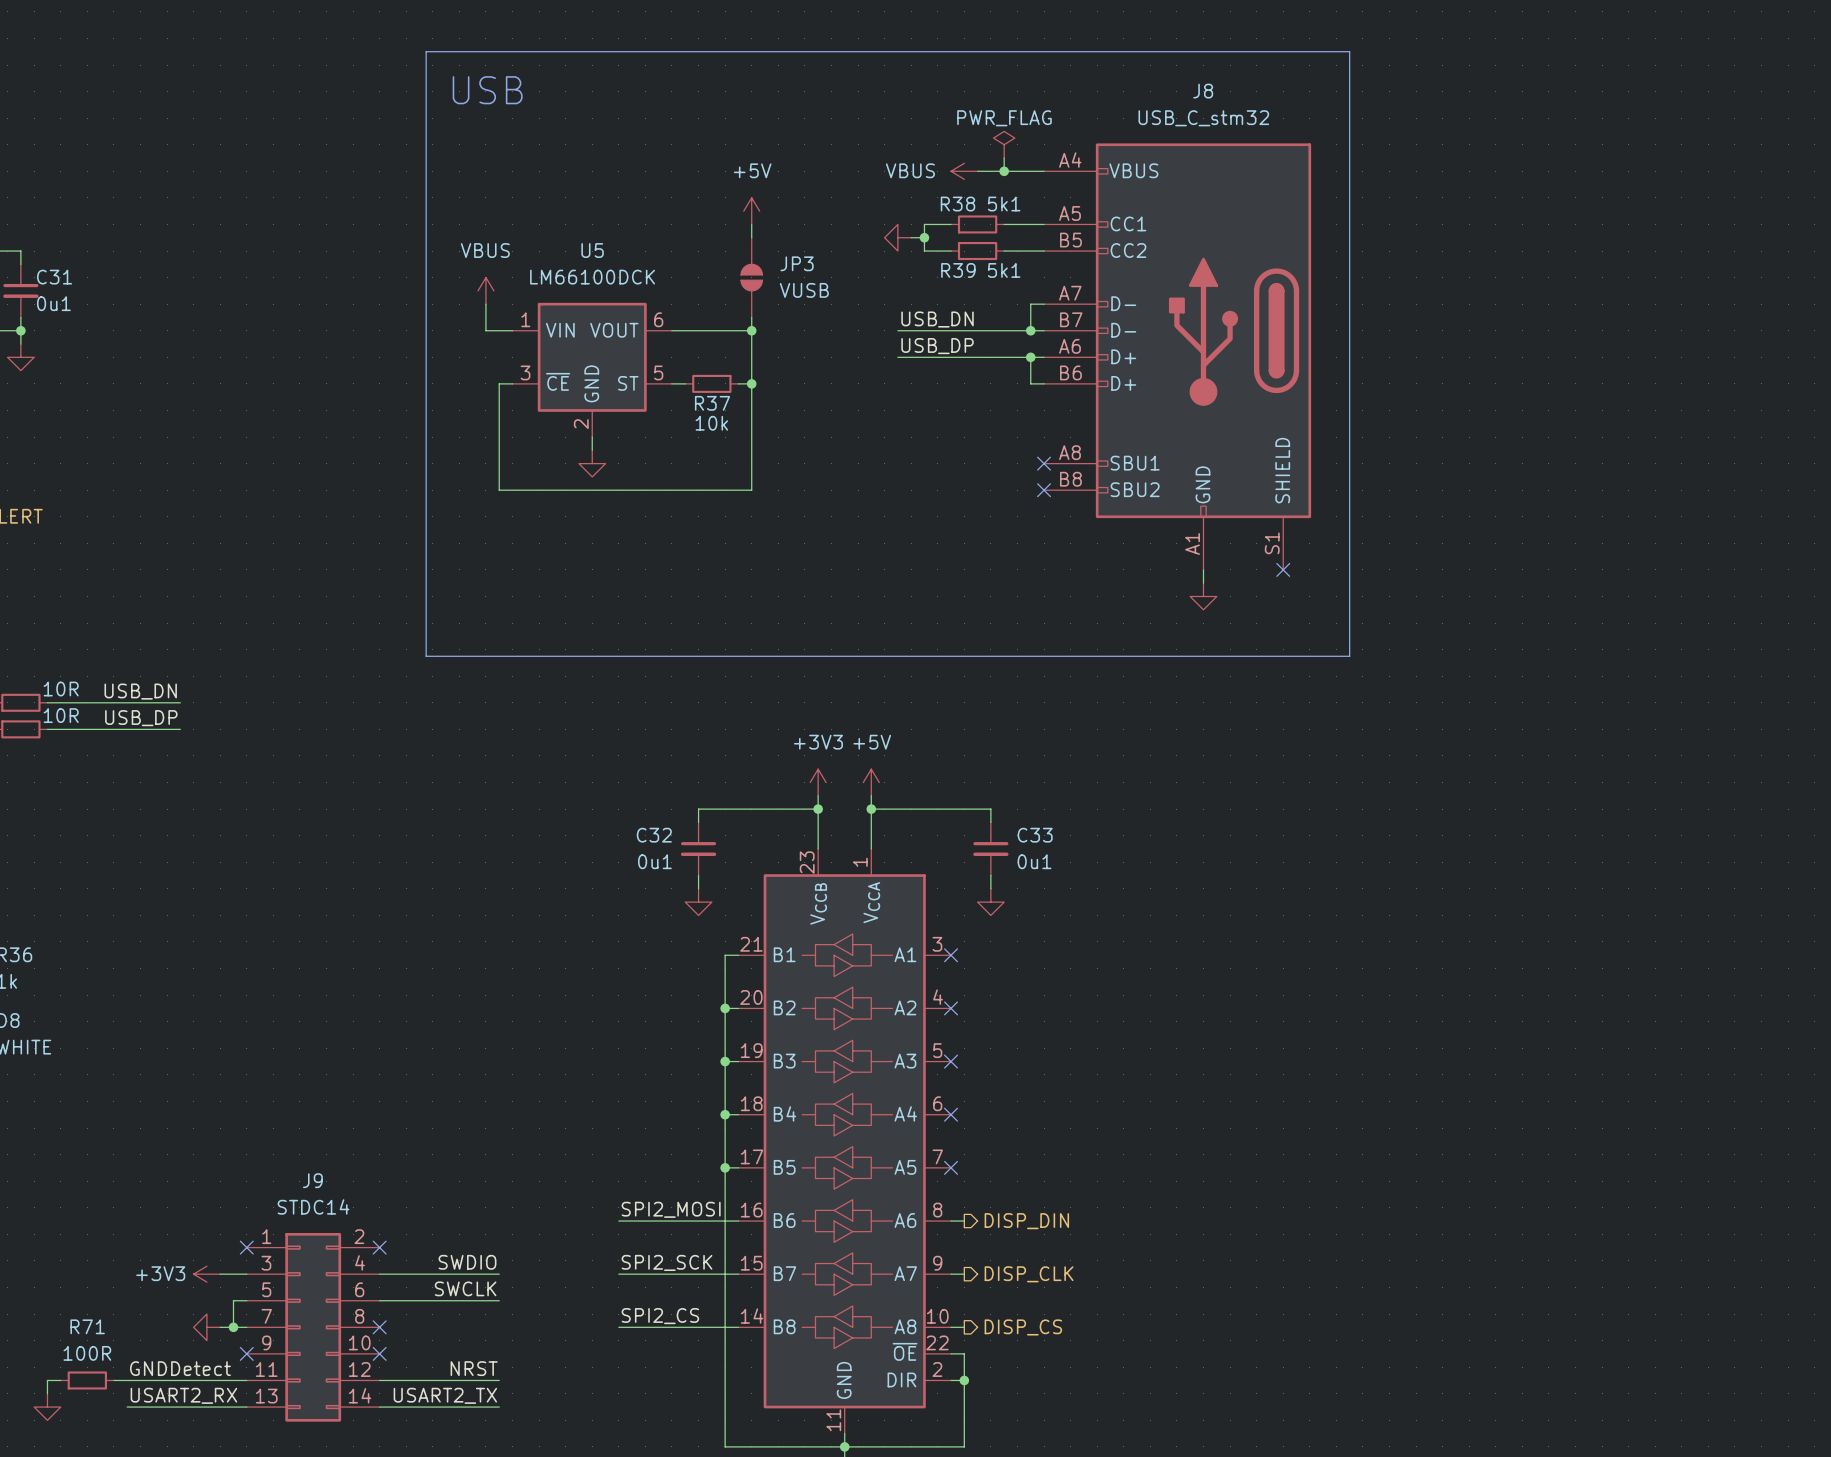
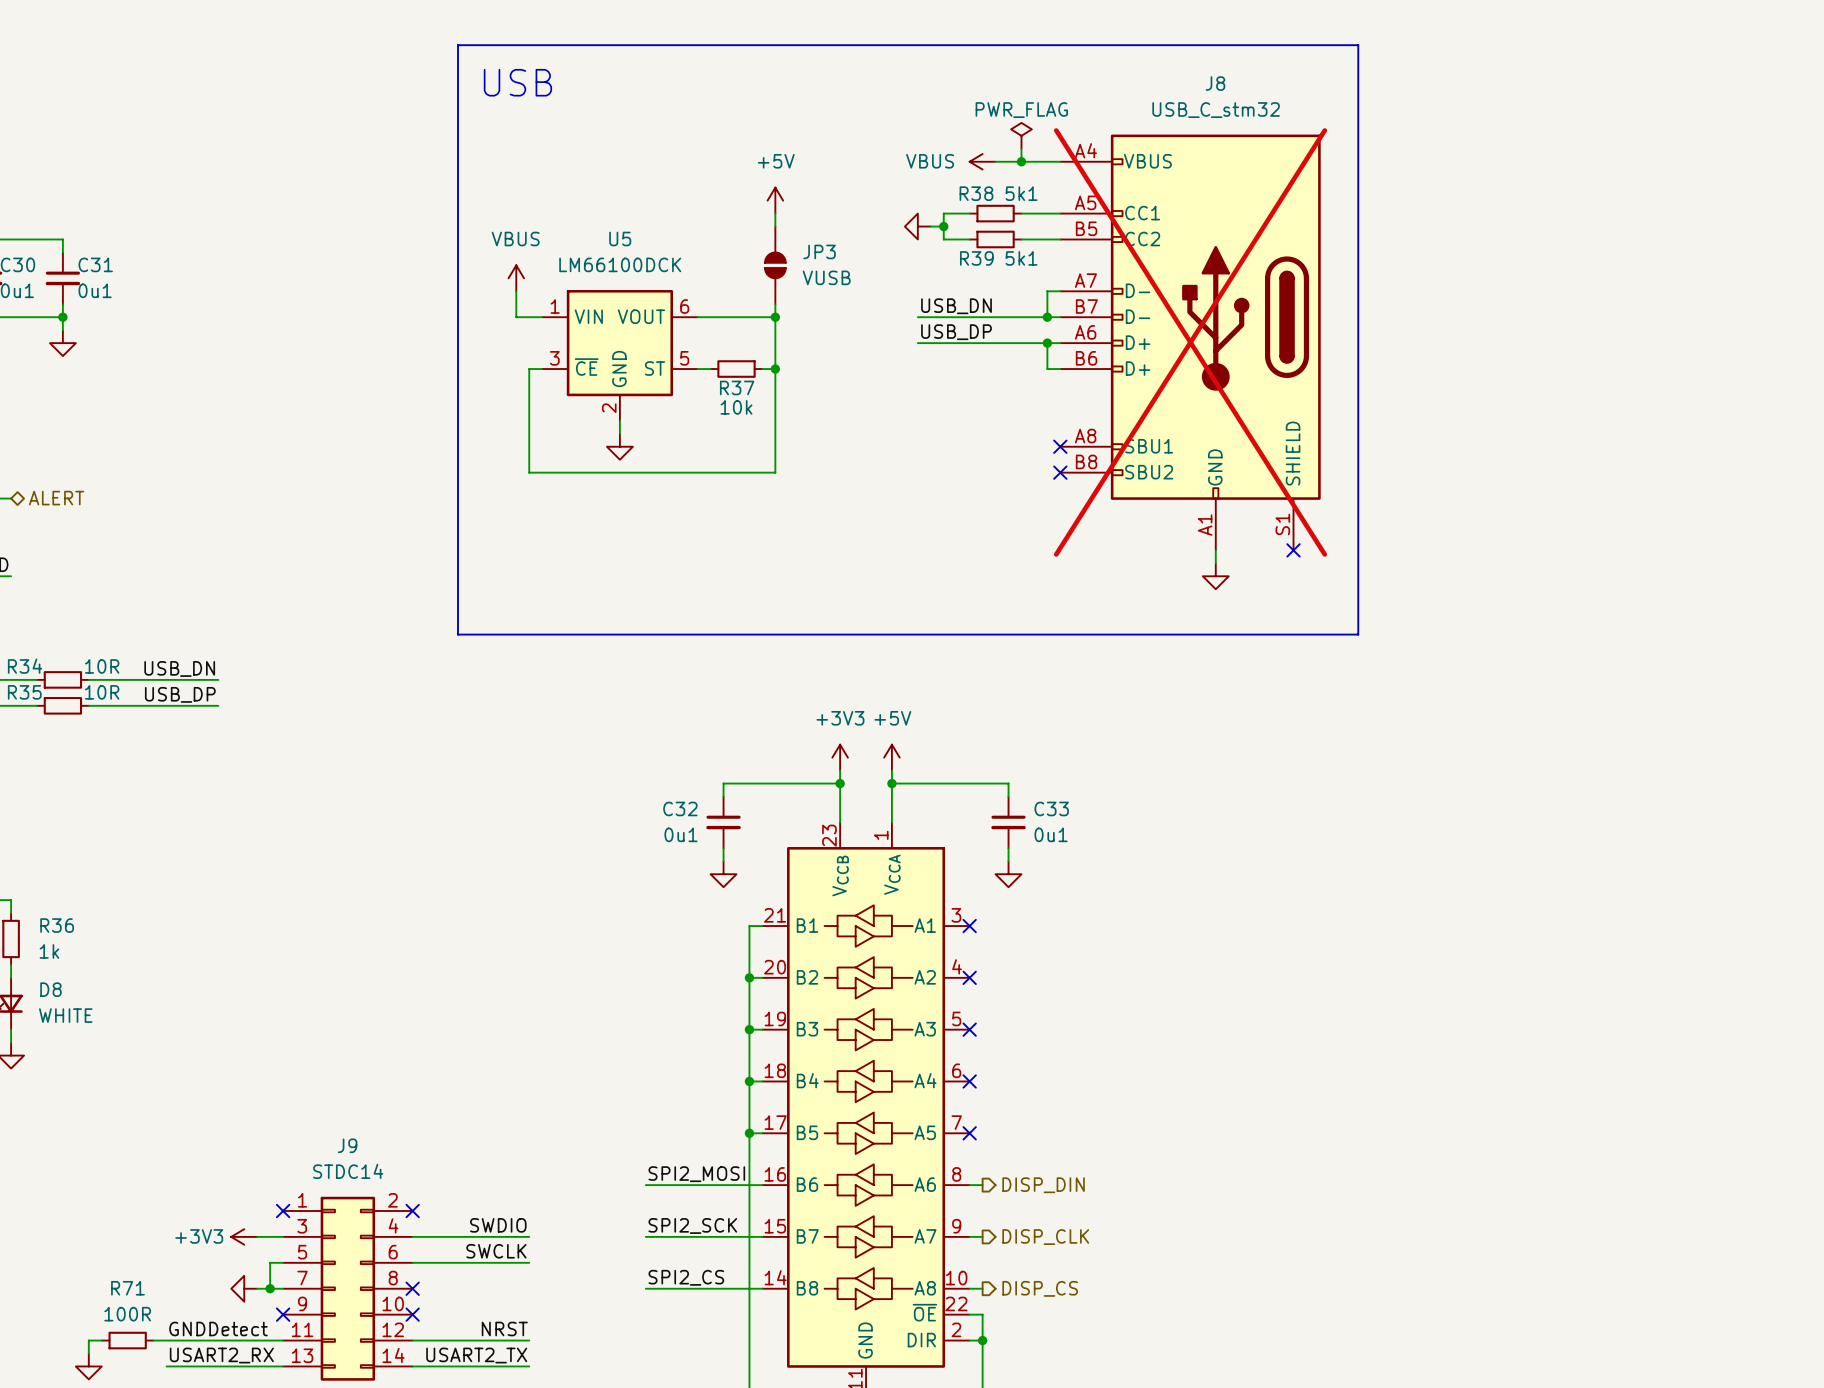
J8 do-not-place cross: none -> (1190, 342)

